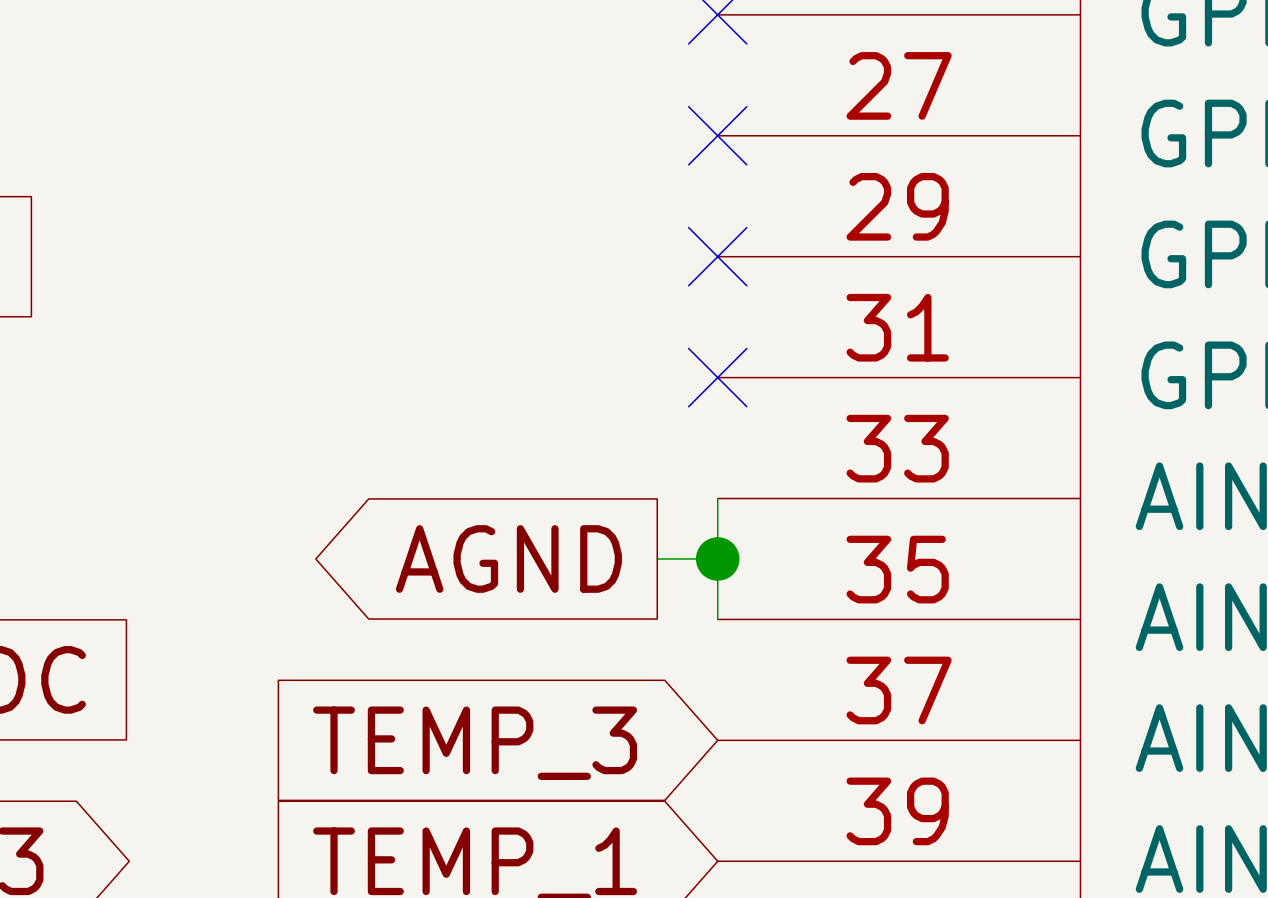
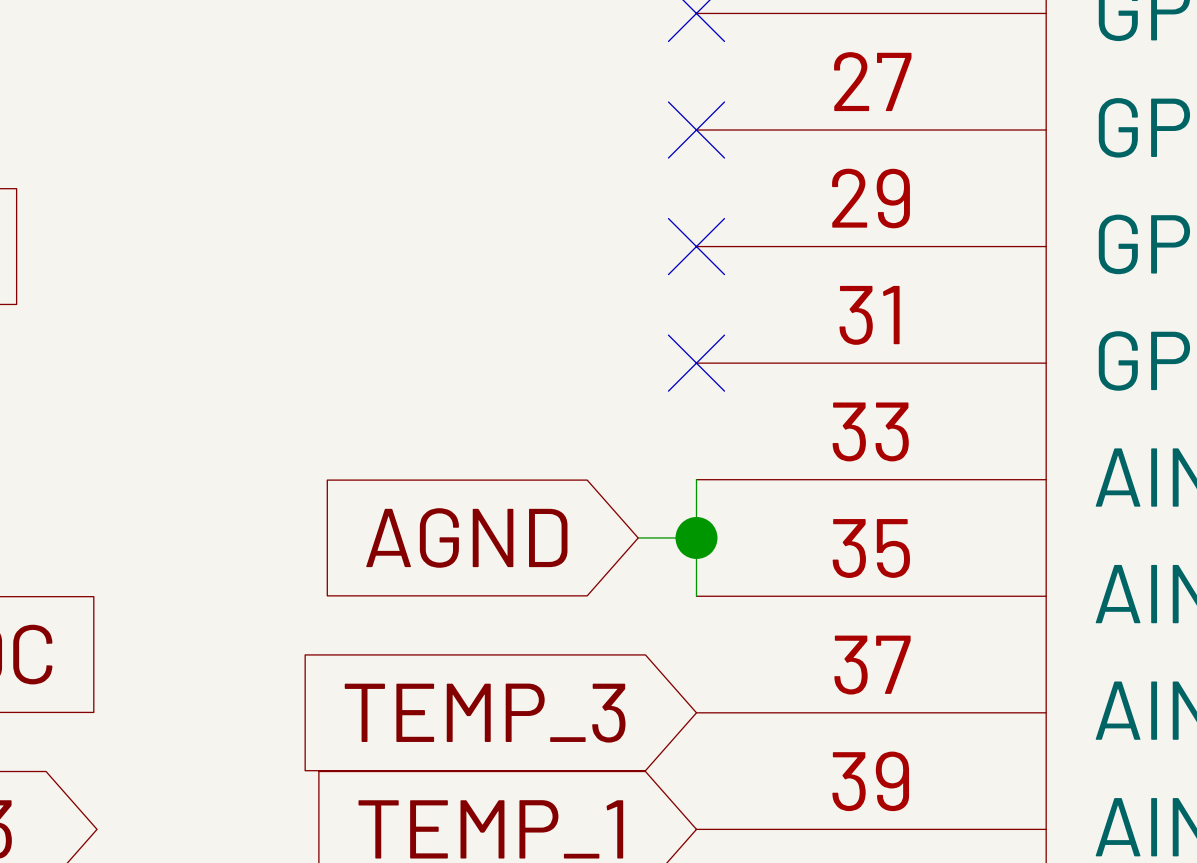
global label shape: output (508, 558) -> input (466, 537)

